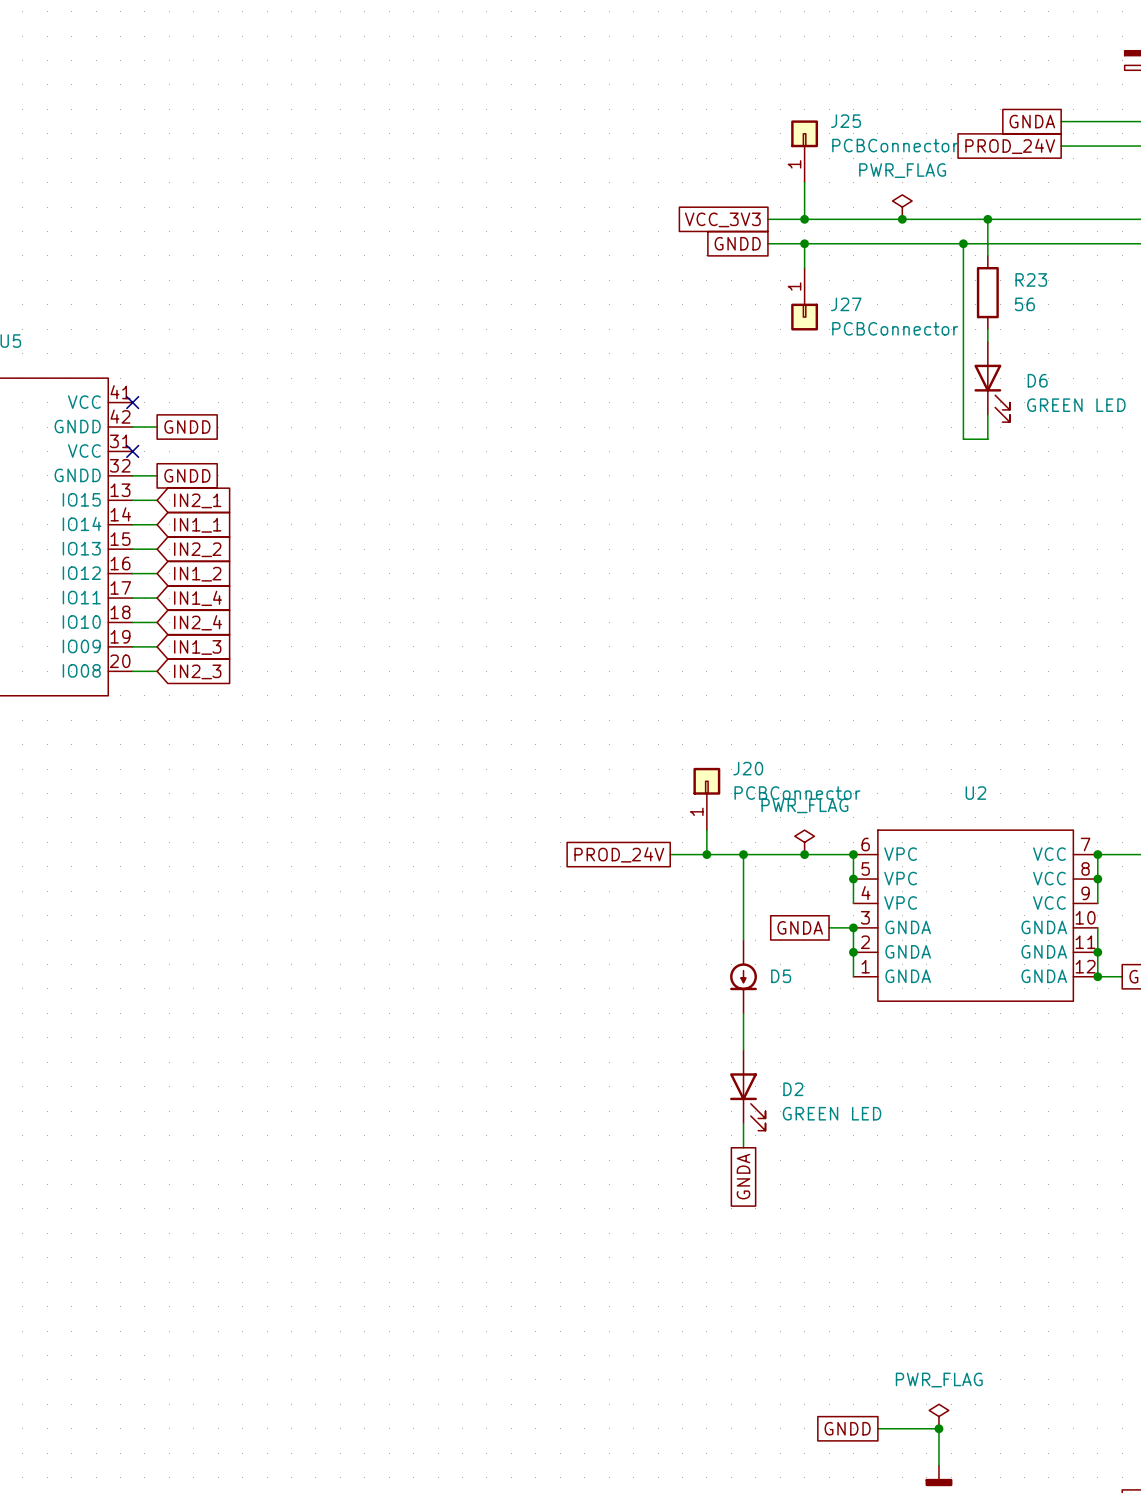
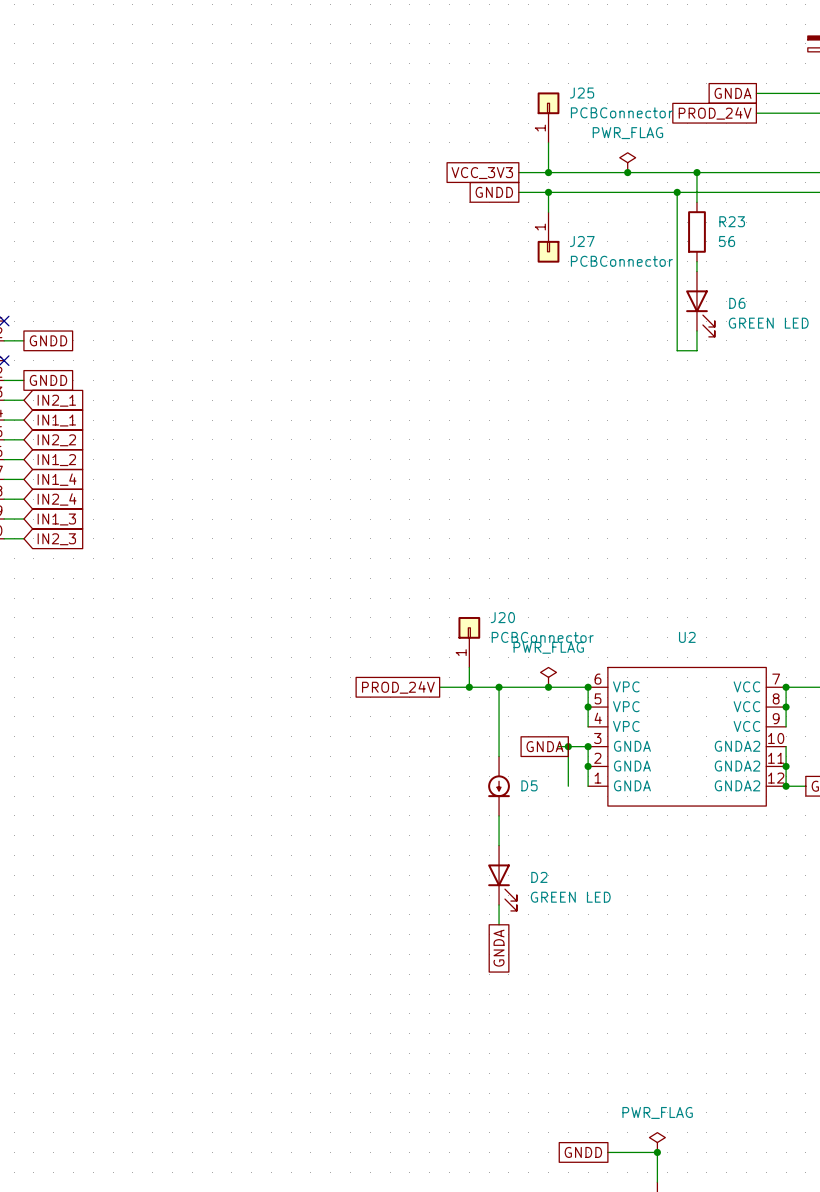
wire: none -> (558, 746) (568, 746) (568, 786)
junction: none -> (568, 746)
U2 pin name: GNDA (1044, 927) -> GNDA2 (737, 746)
U2 pin name: GNDA (1044, 951) -> GNDA2 (737, 766)
U2 pin name: GNDA (1044, 976) -> GNDA2 (737, 785)

